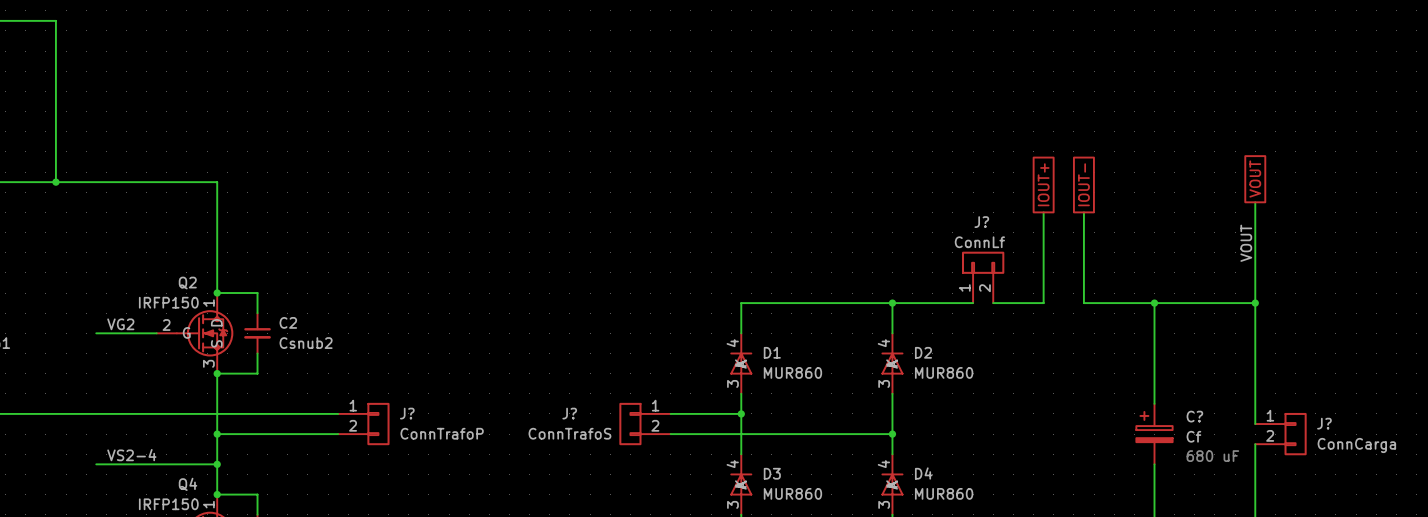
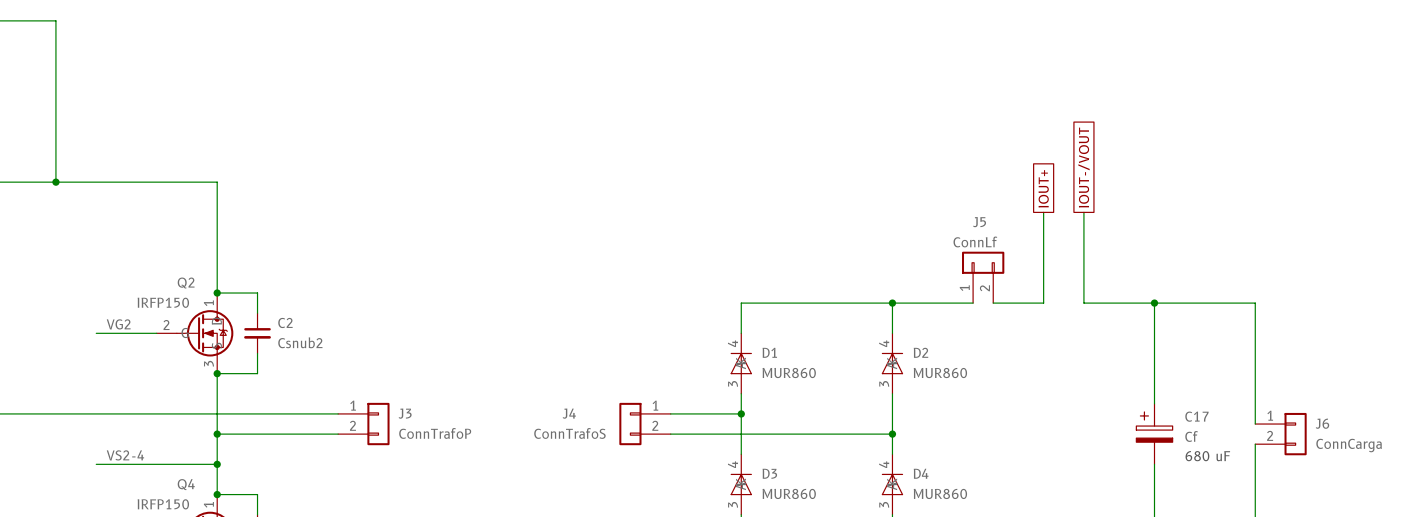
global label: VOUT (1255, 179) -> none
global label: IOUT- (1083, 184) -> IOUT-/VOUT (1084, 167)
wire: (1255, 202) (1255, 303) -> none
J? name: J? (981, 222) -> J5 (979, 222)
label: VOUT (1246, 243) -> none
junction: (1255, 303) -> none
J? name: J? (407, 413) -> J3 (405, 413)
J? name: J? (569, 413) -> J4 (569, 413)
C? name: C? (1194, 416) -> C17 (1196, 416)
J? name: J? (1324, 423) -> J6 (1322, 423)

